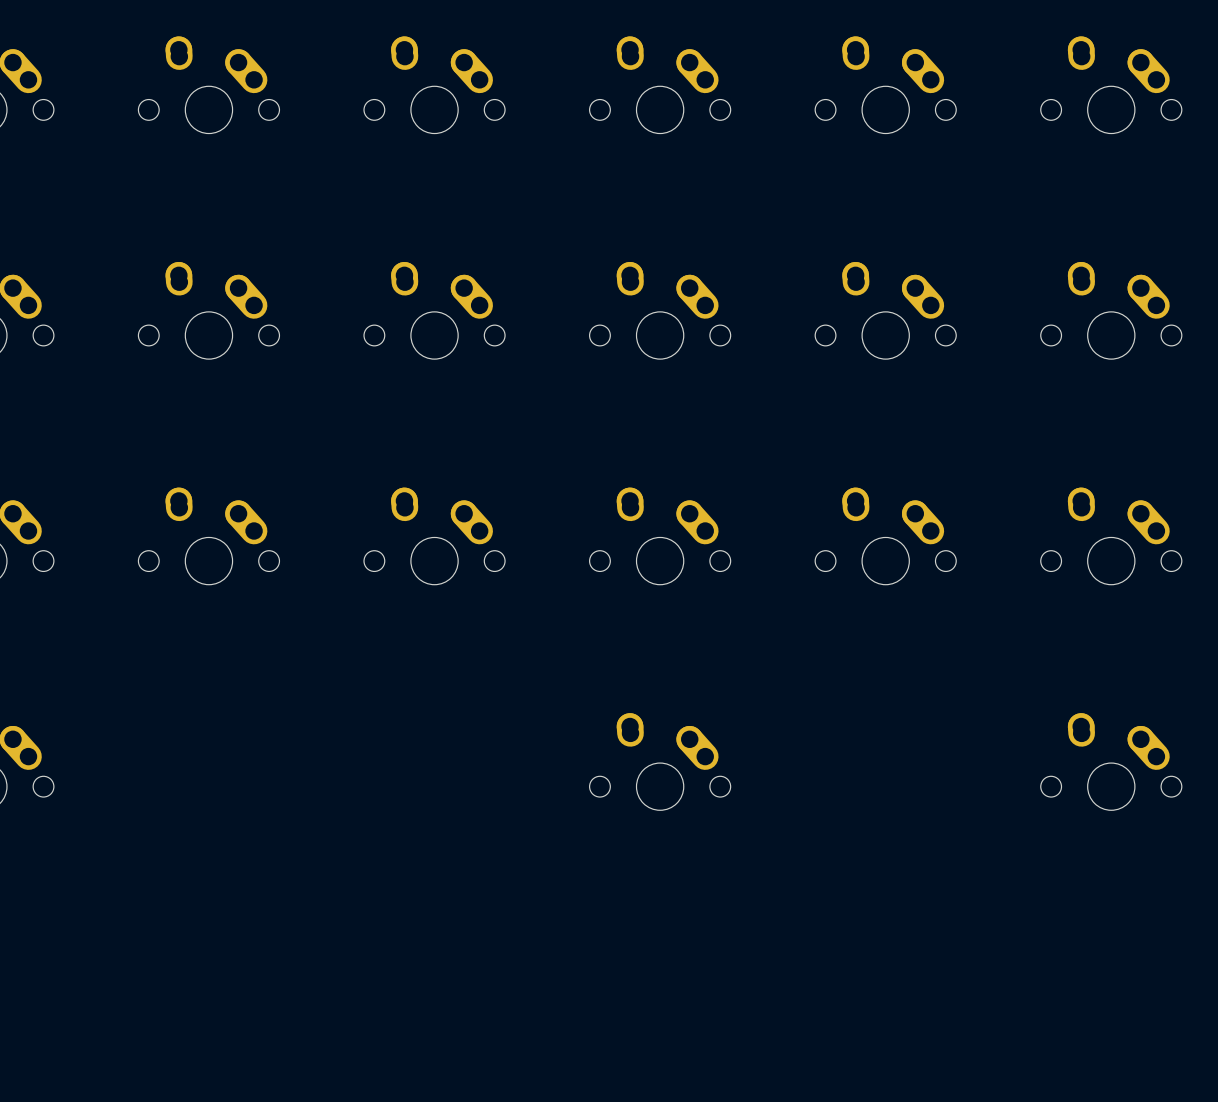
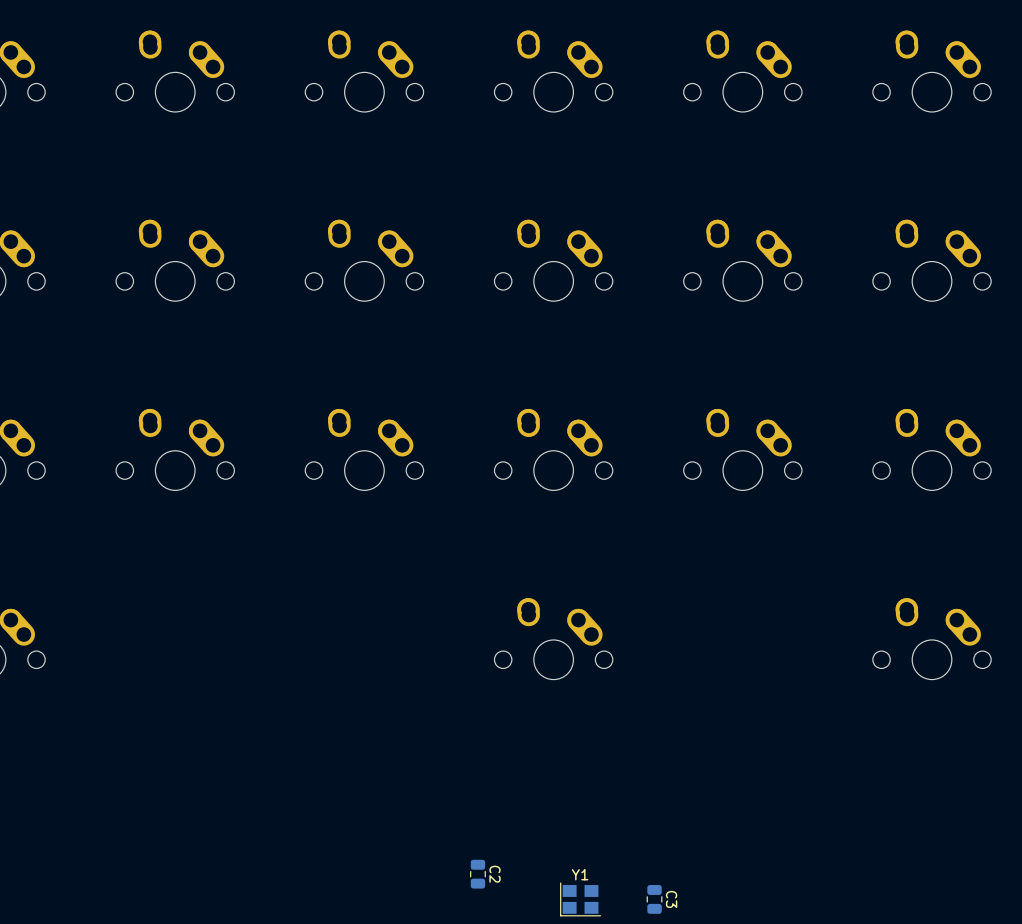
C2: none -> (477, 874)
Y1: none -> (580, 899)
C3: none -> (654, 899)

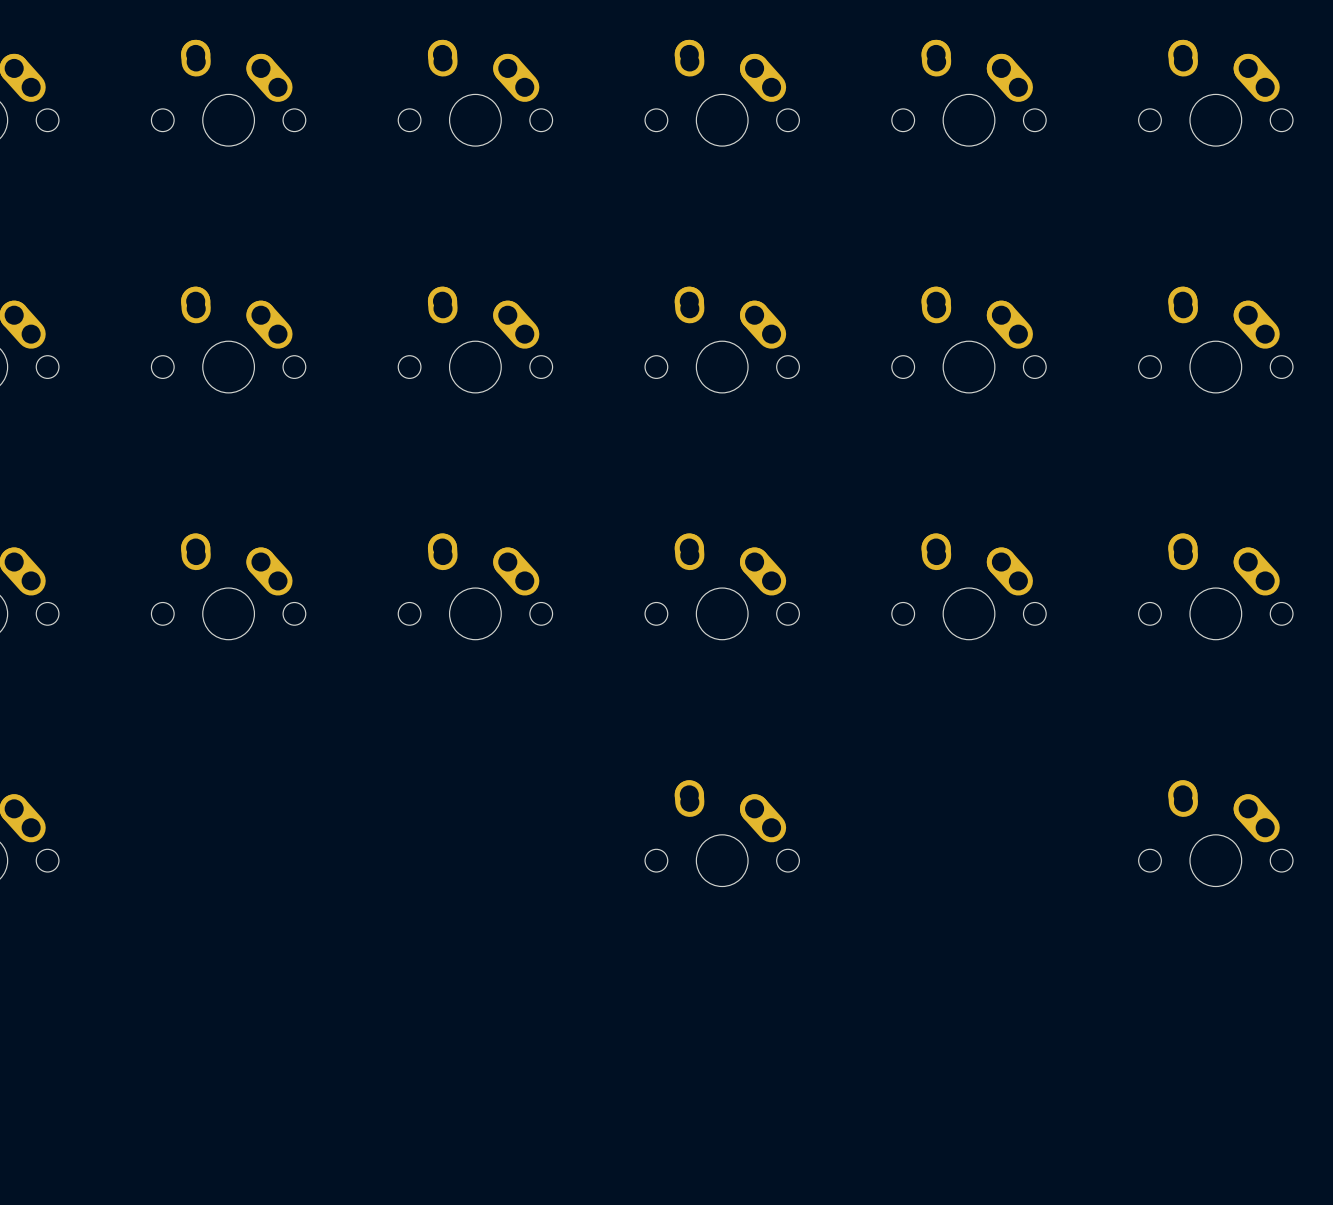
C2: (477, 874) -> none
Y1: (580, 899) -> none
C3: (654, 899) -> none

